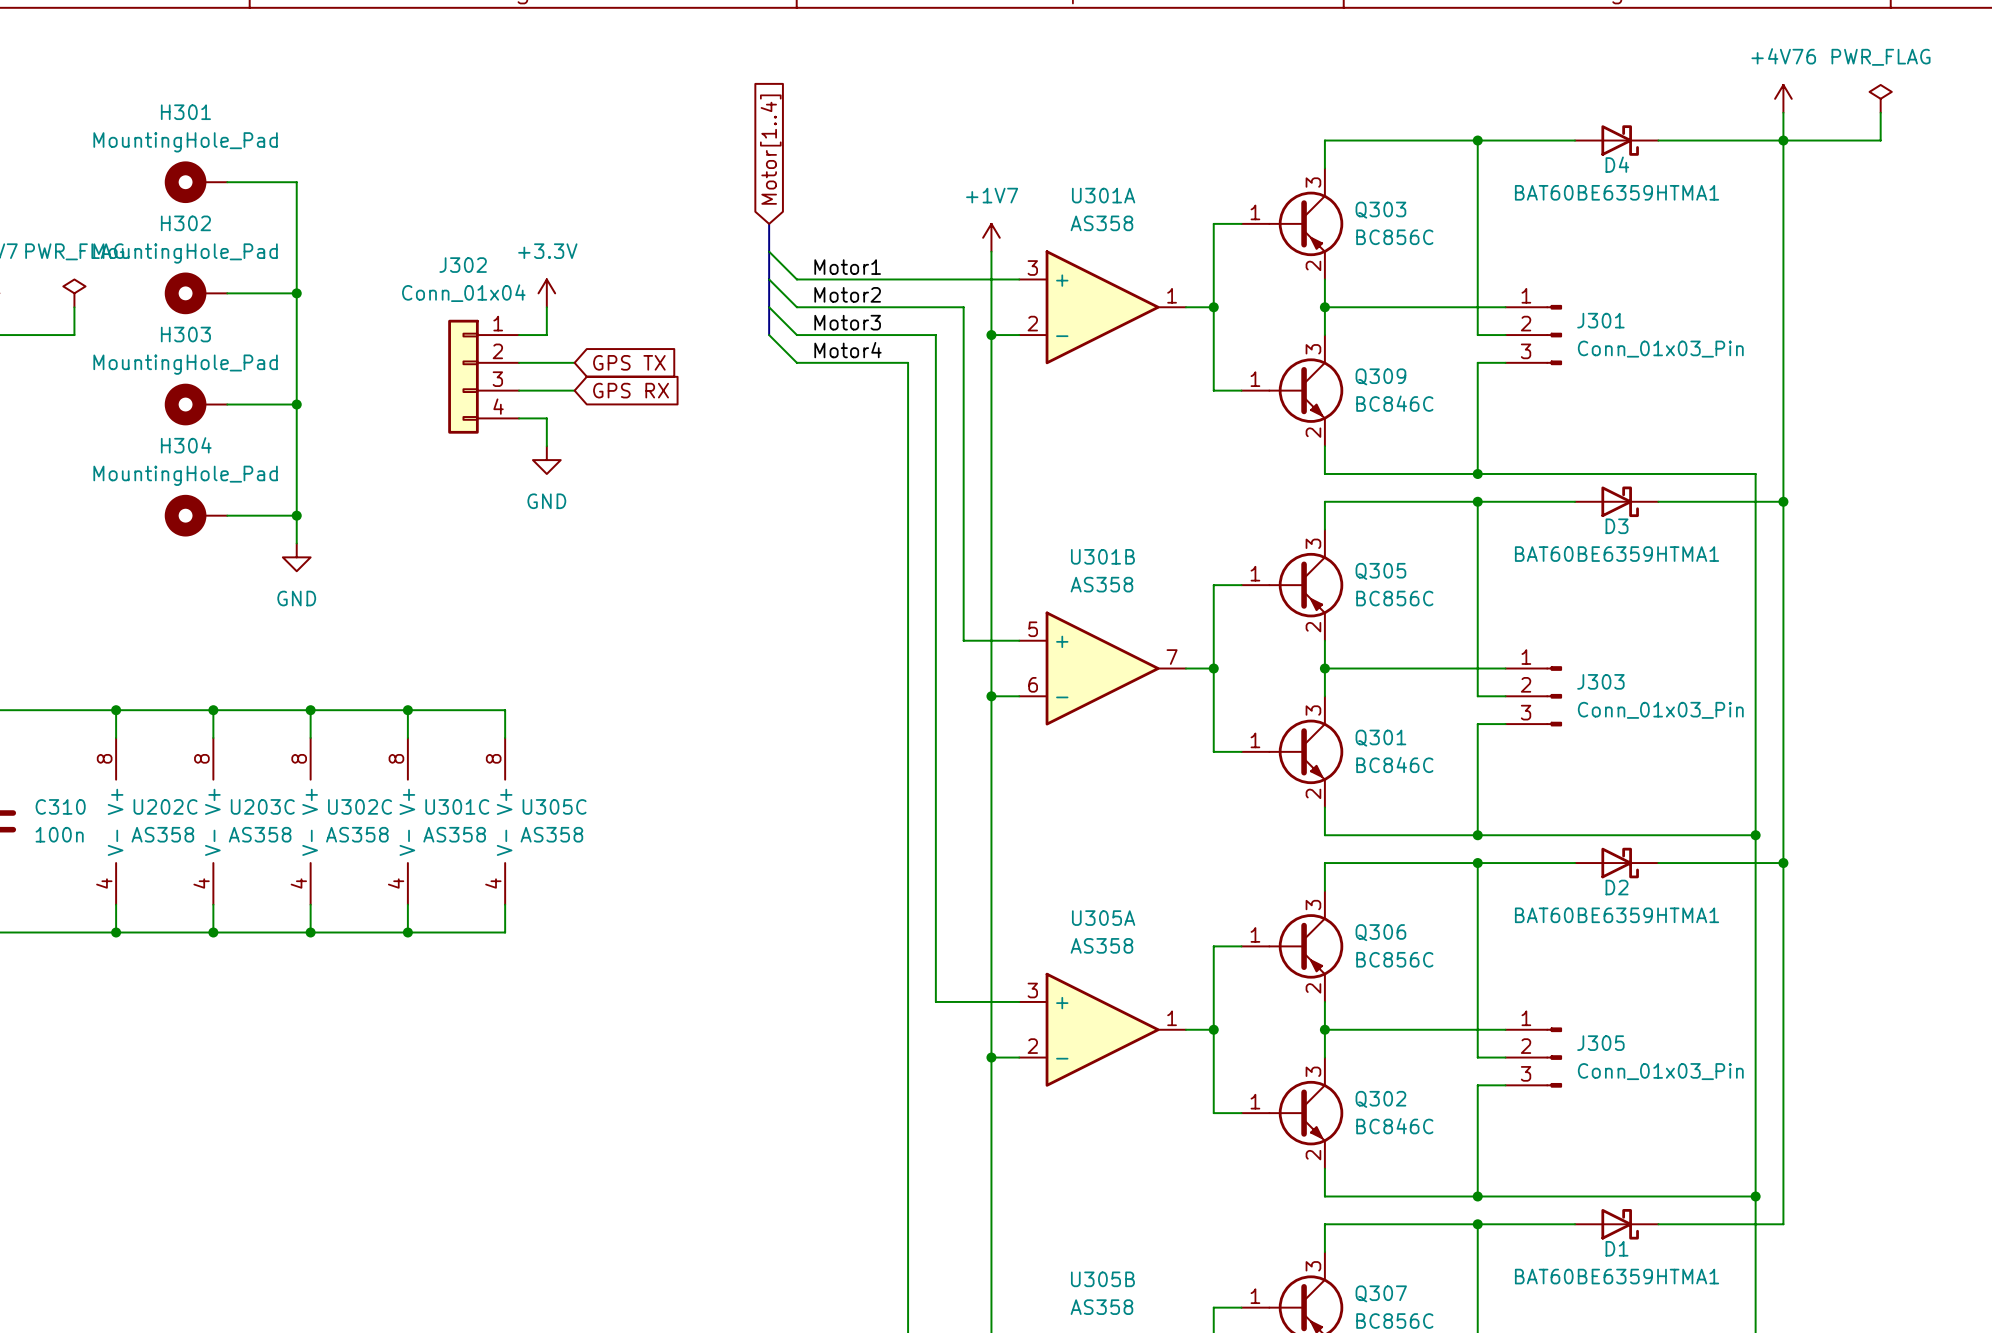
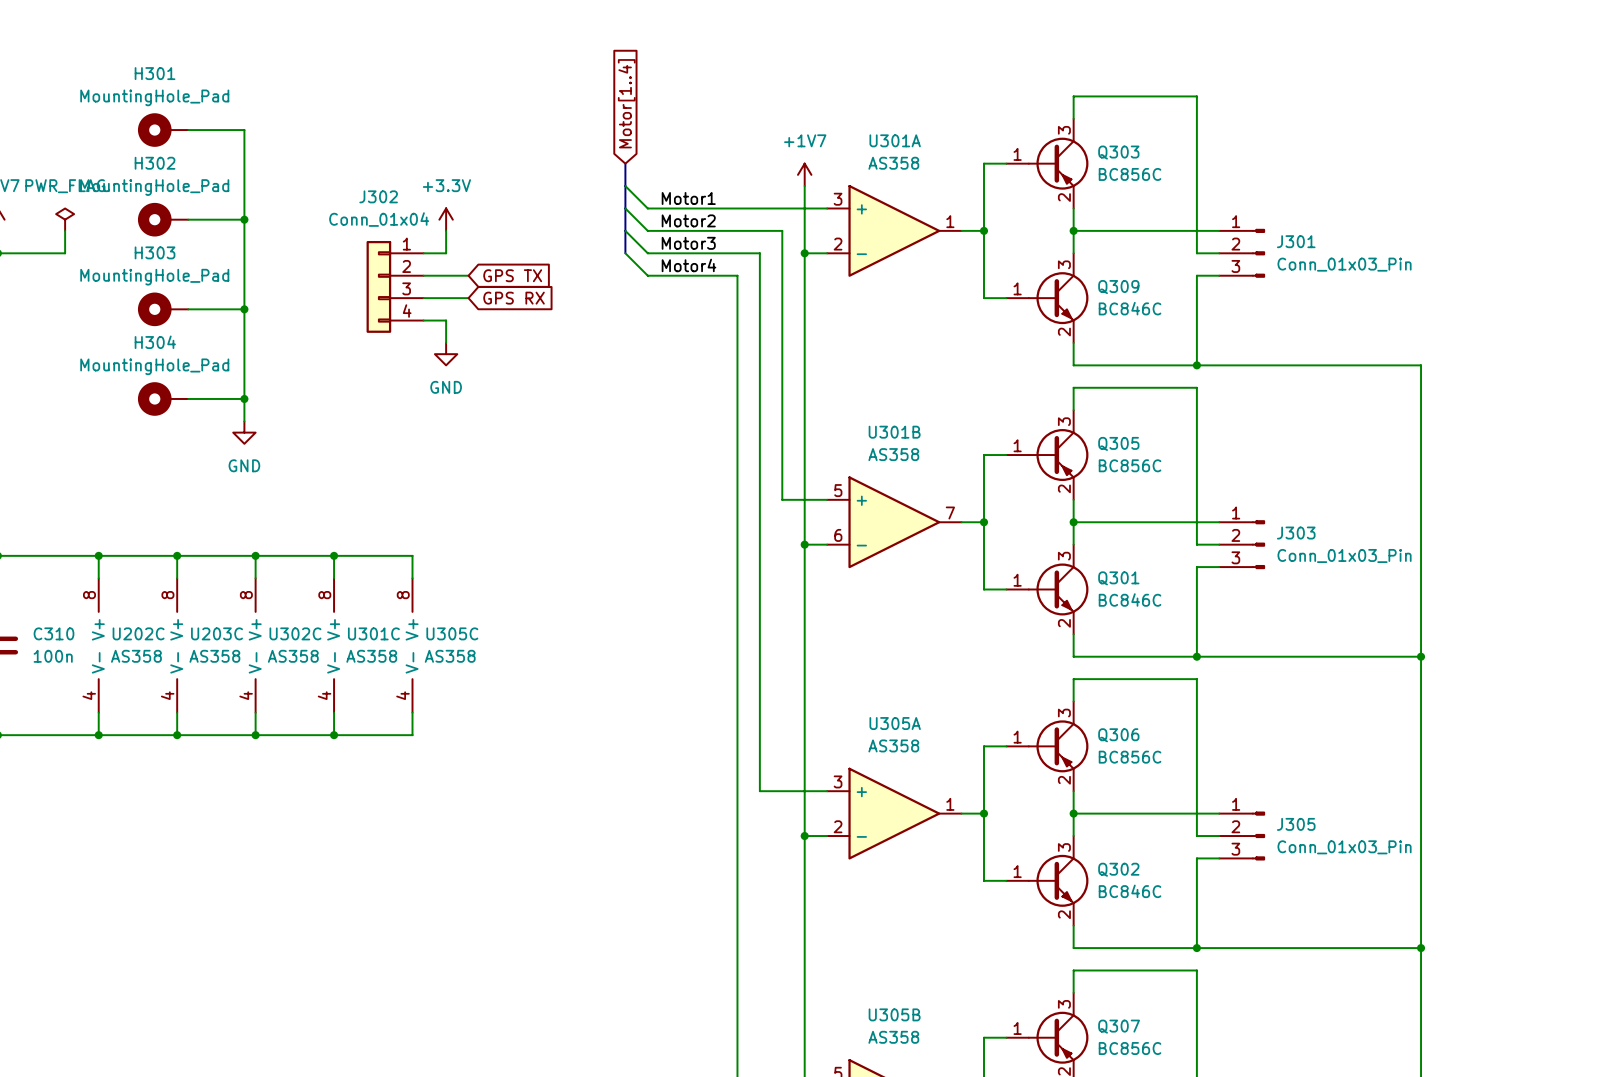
power symbol: +4V76 (1783, 98) -> none
power symbol: PWR_FLAG (1880, 98) -> none
wire: (1783, 112) (1783, 1224) (1658, 1224) -> none
wire: (1880, 112) (1880, 140) (1658, 140) -> none
wire: (1477, 140) (1575, 140) -> none
junction: (1477, 140) -> none
D4: BAT60BE6359HTMA1 (1616, 140) -> none
junction: (1783, 140) -> none
wire: (1477, 501) (1575, 501) -> none
junction: (1477, 501) -> none
D3: BAT60BE6359HTMA1 (1616, 501) -> none
wire: (1658, 501) (1783, 501) -> none
junction: (1783, 501) -> none
wire: (1477, 863) (1575, 863) -> none
junction: (1477, 863) -> none
D2: BAT60BE6359HTMA1 (1616, 863) -> none
wire: (1658, 863) (1783, 863) -> none
junction: (1783, 863) -> none
wire: (1477, 1224) (1575, 1224) -> none
junction: (1477, 1224) -> none
D1: BAT60BE6359HTMA1 (1616, 1224) -> none

